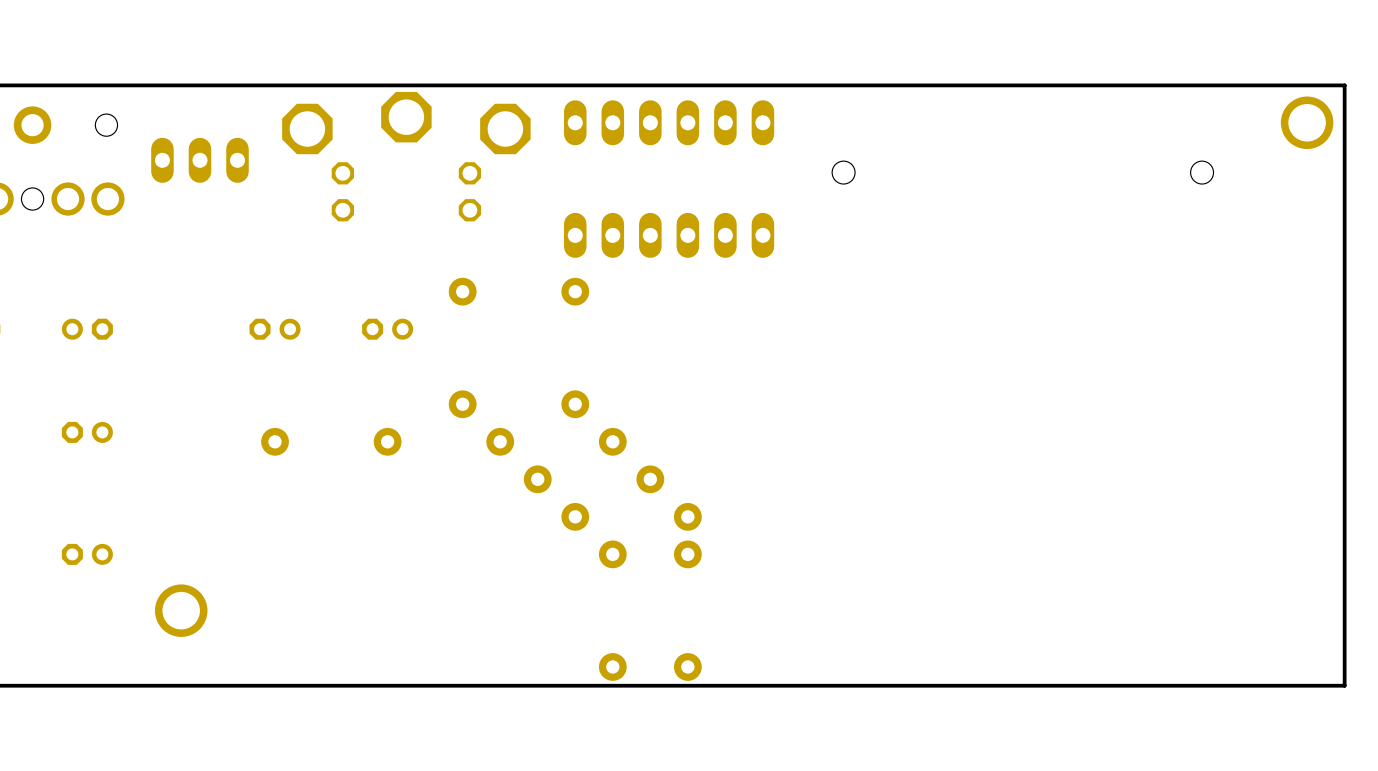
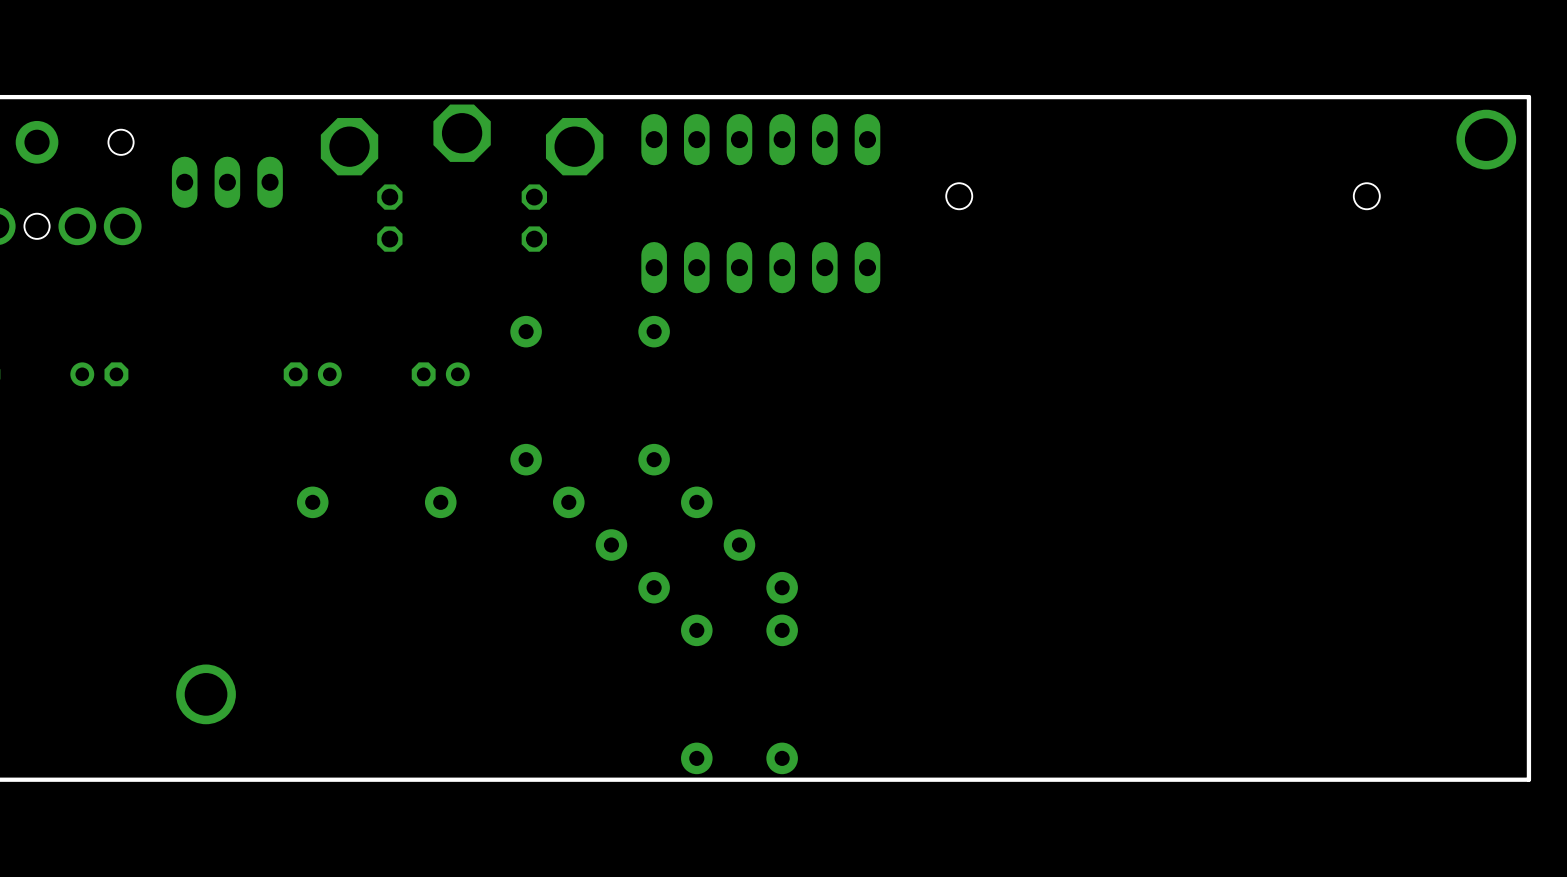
part: (87, 432) -> none
part: (87, 554) -> none

